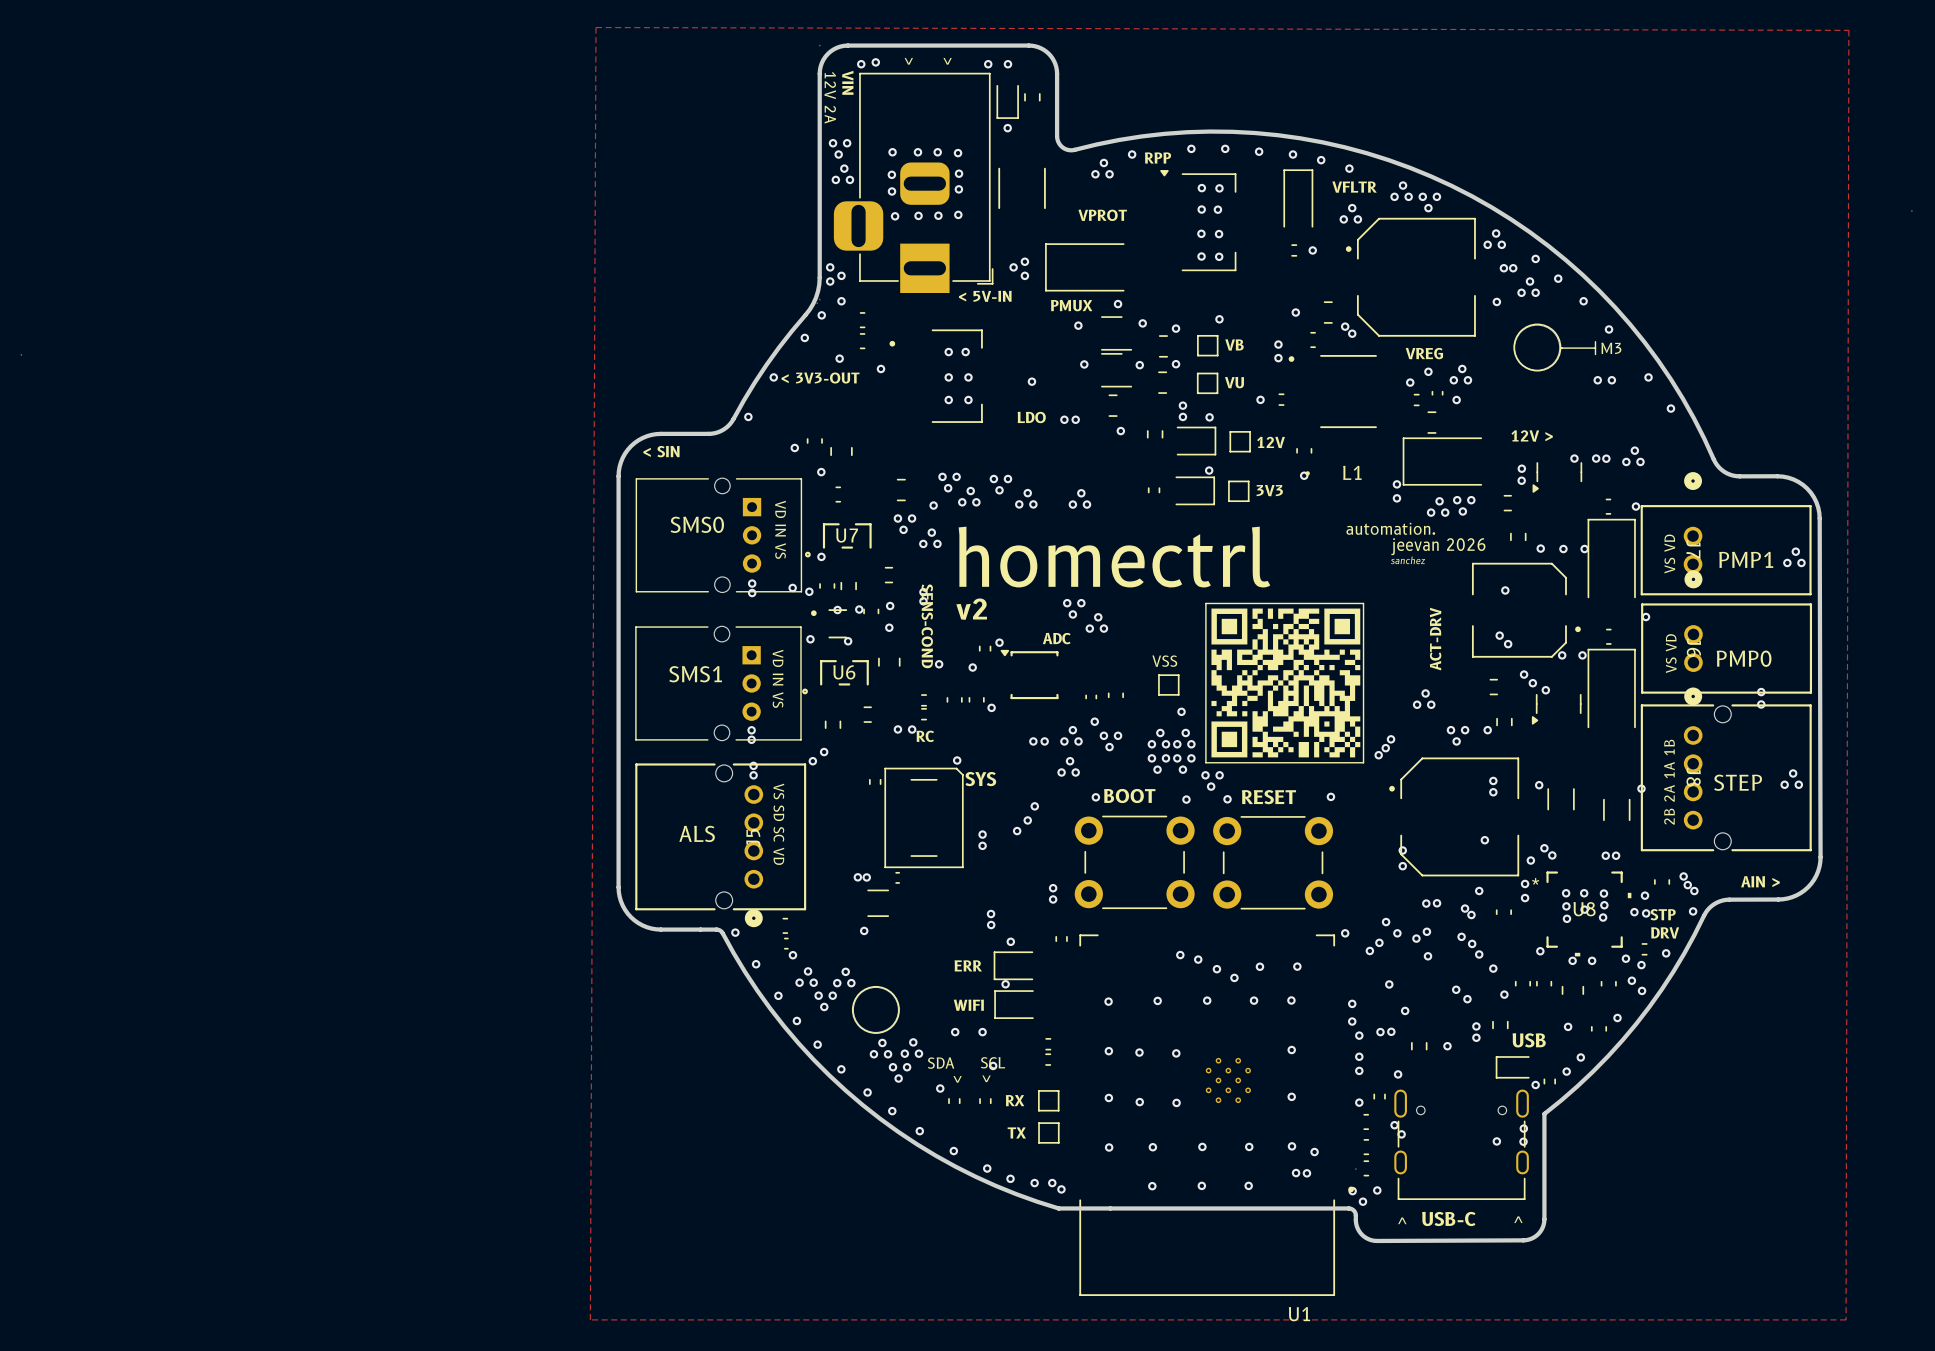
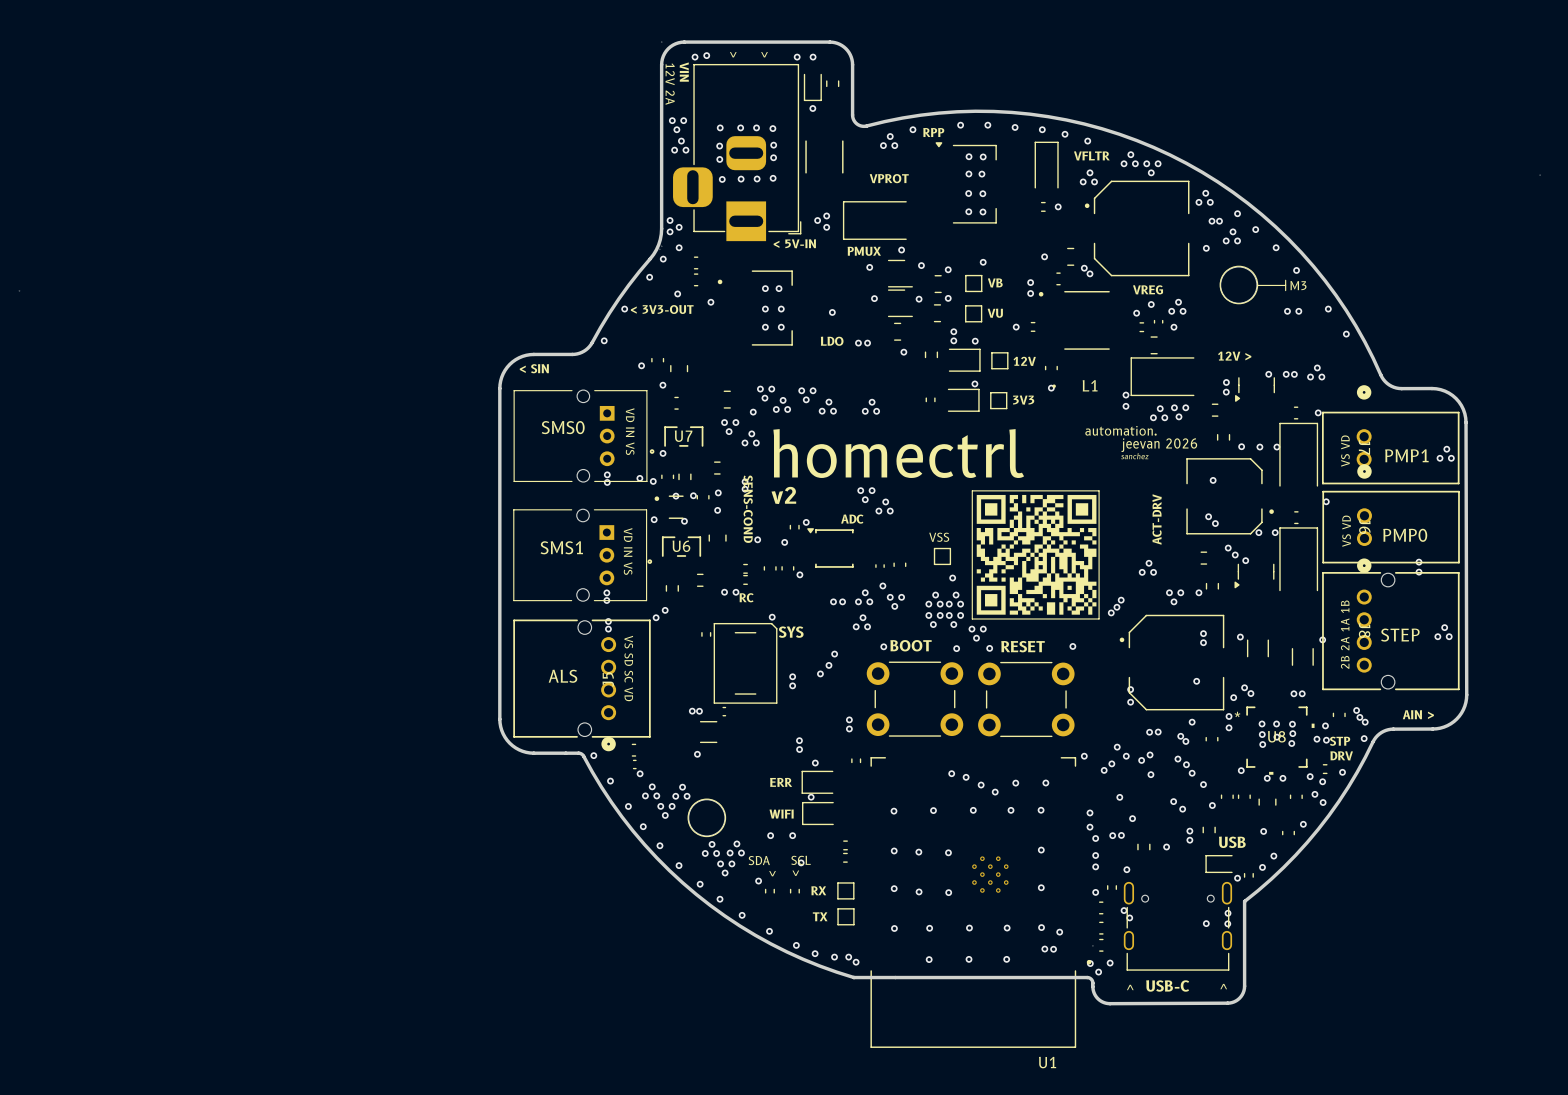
zone outline: (595, 27) (1848, 30) (1846, 1319) (590, 1319) (595, 27) -> none

